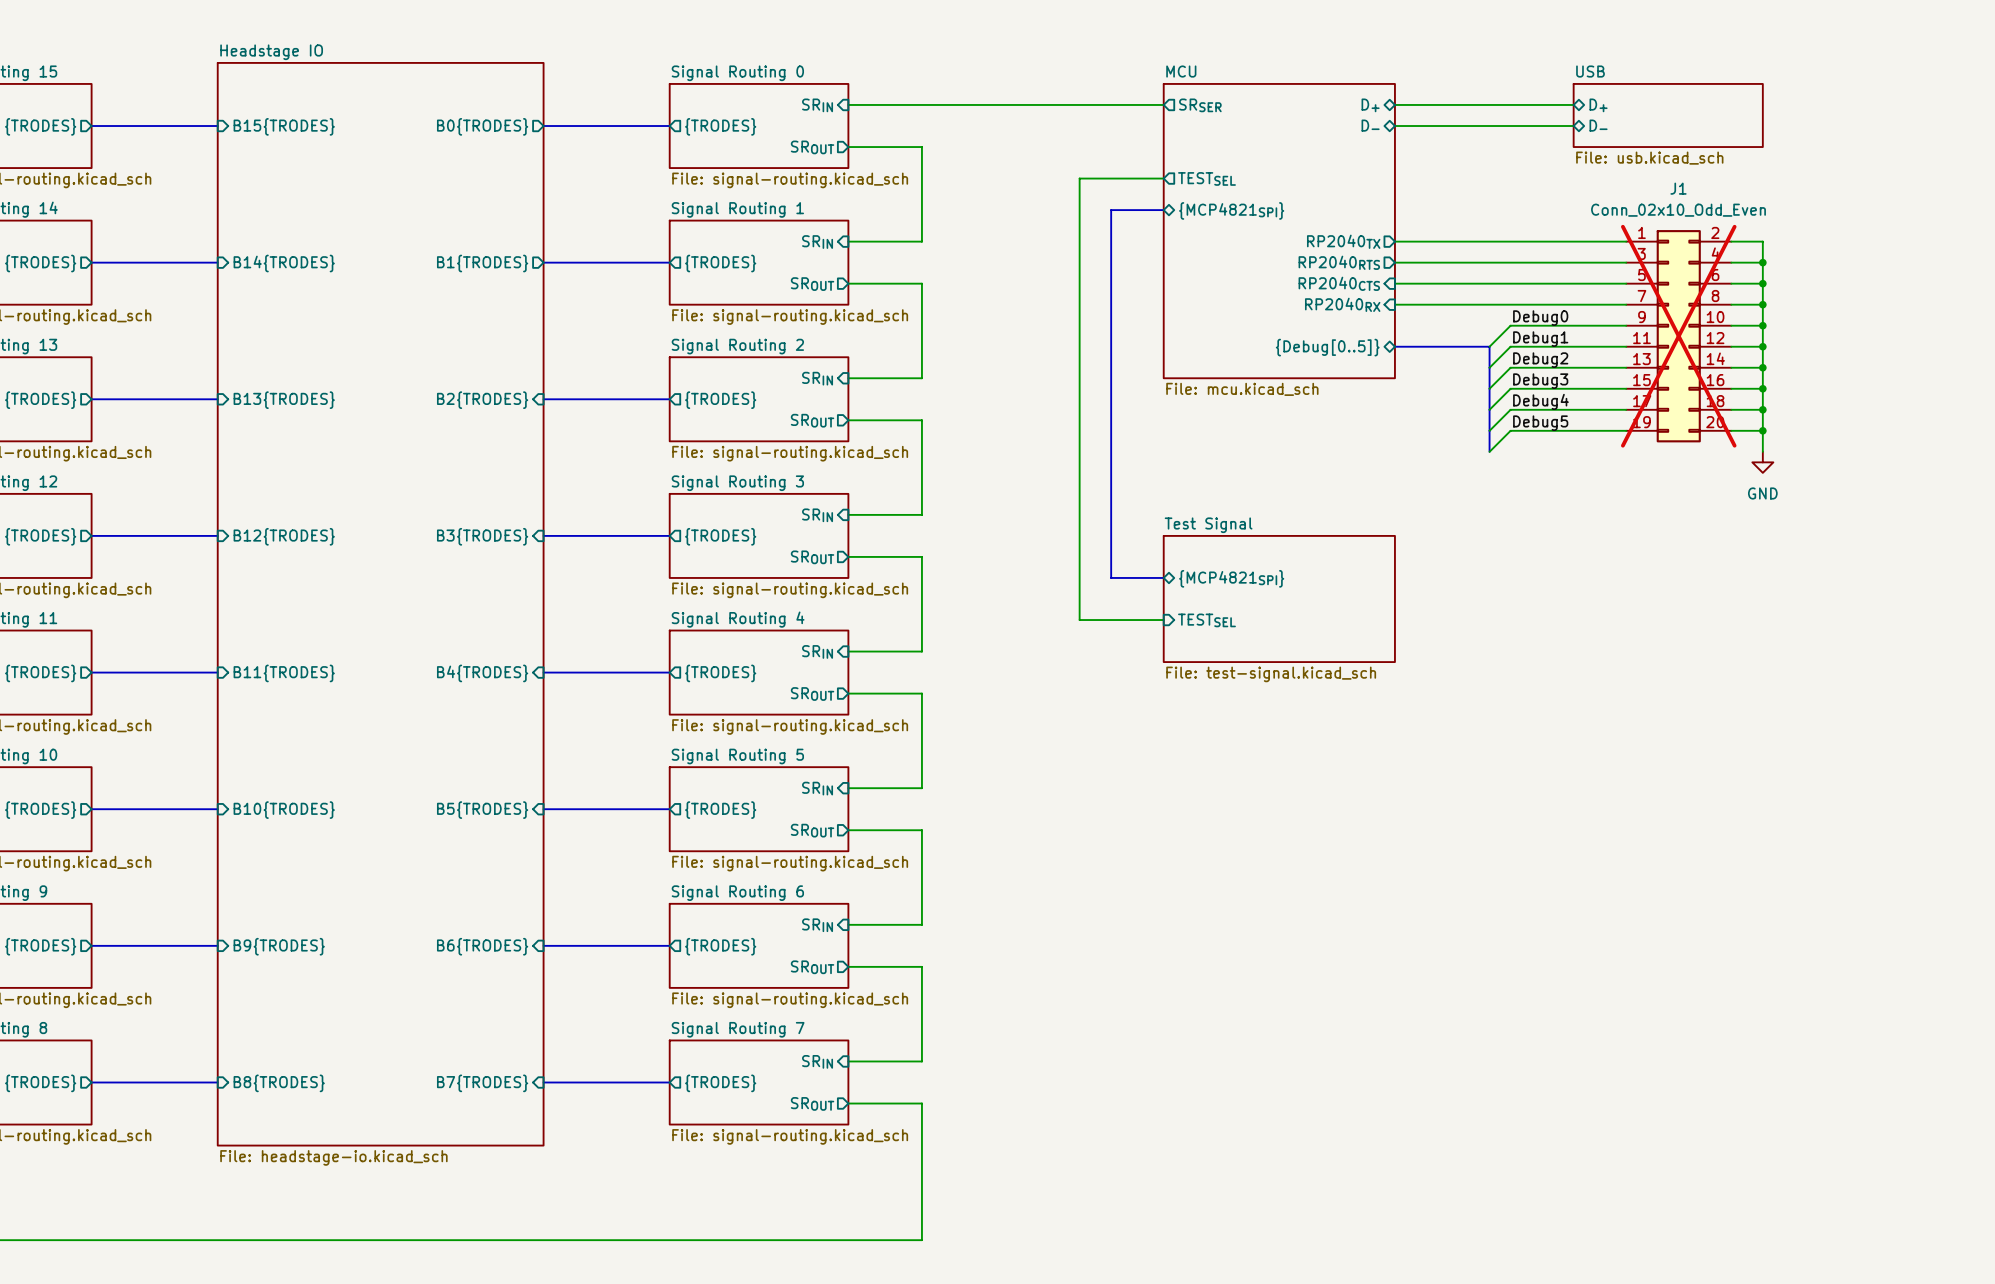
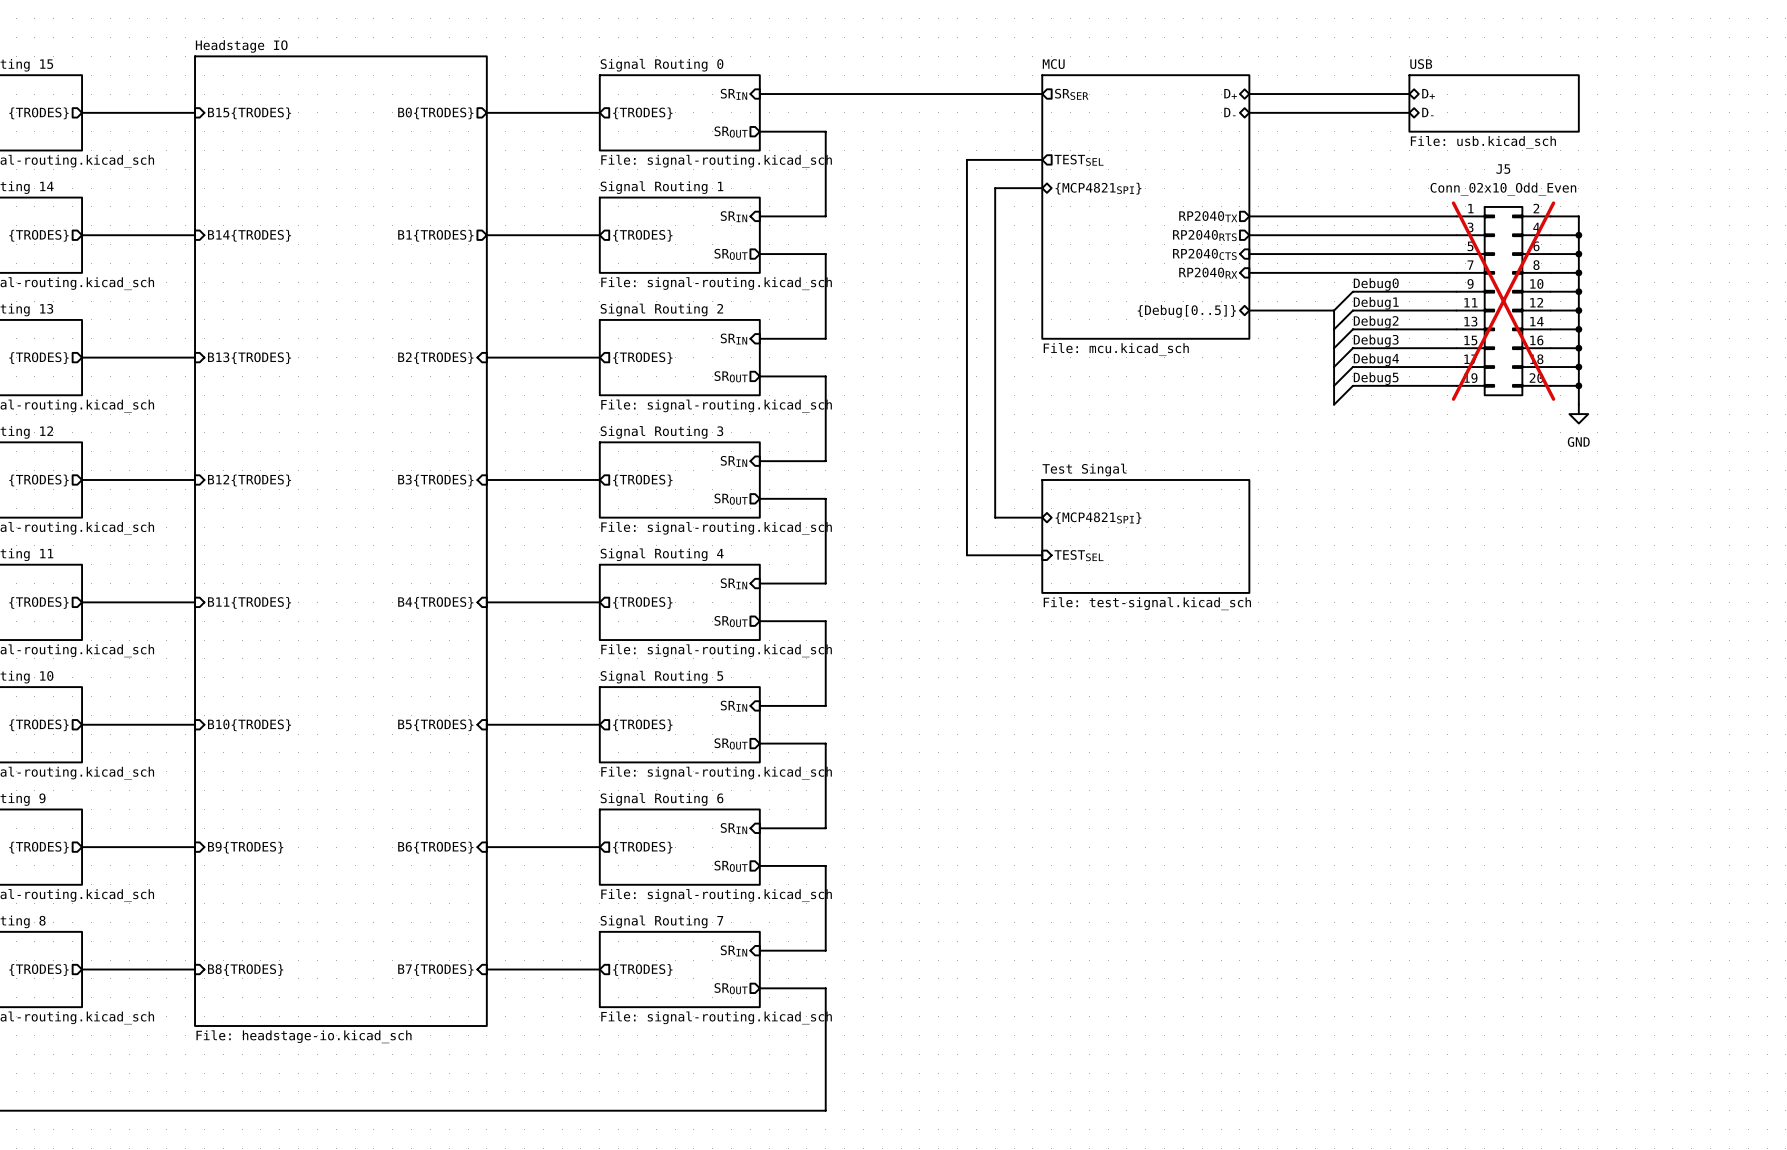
J1 name: J1 (1678, 188) -> J5 (1503, 169)
sheet Test Signal name: Test Signal (1208, 525) -> Test Singal (1084, 470)

